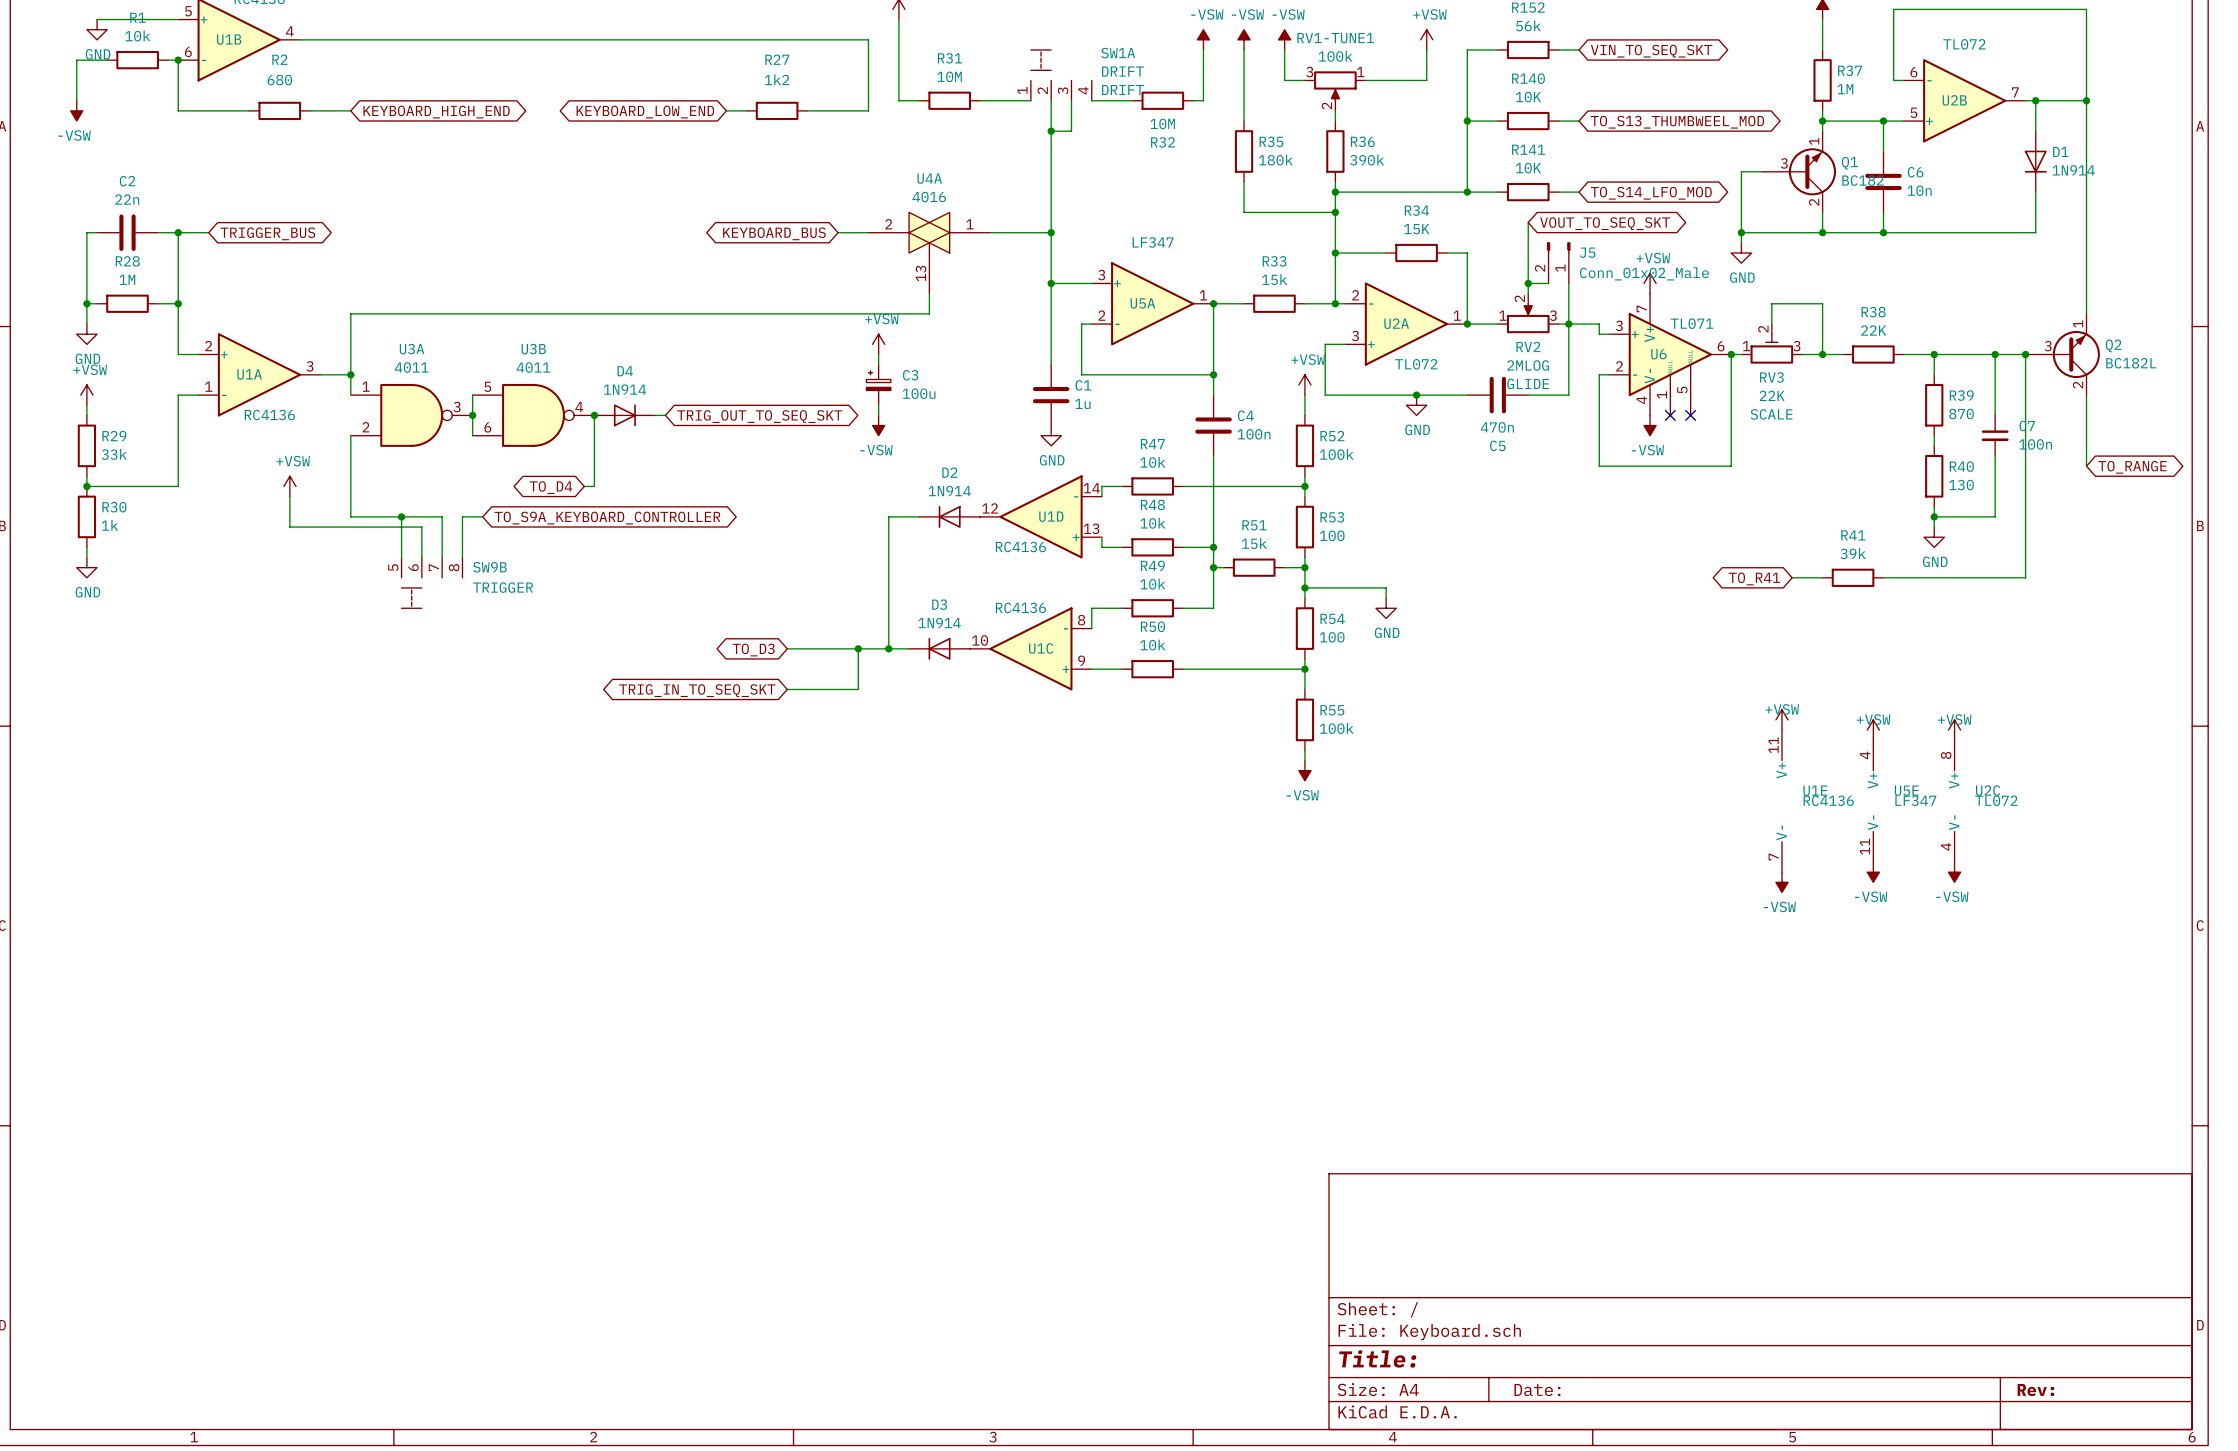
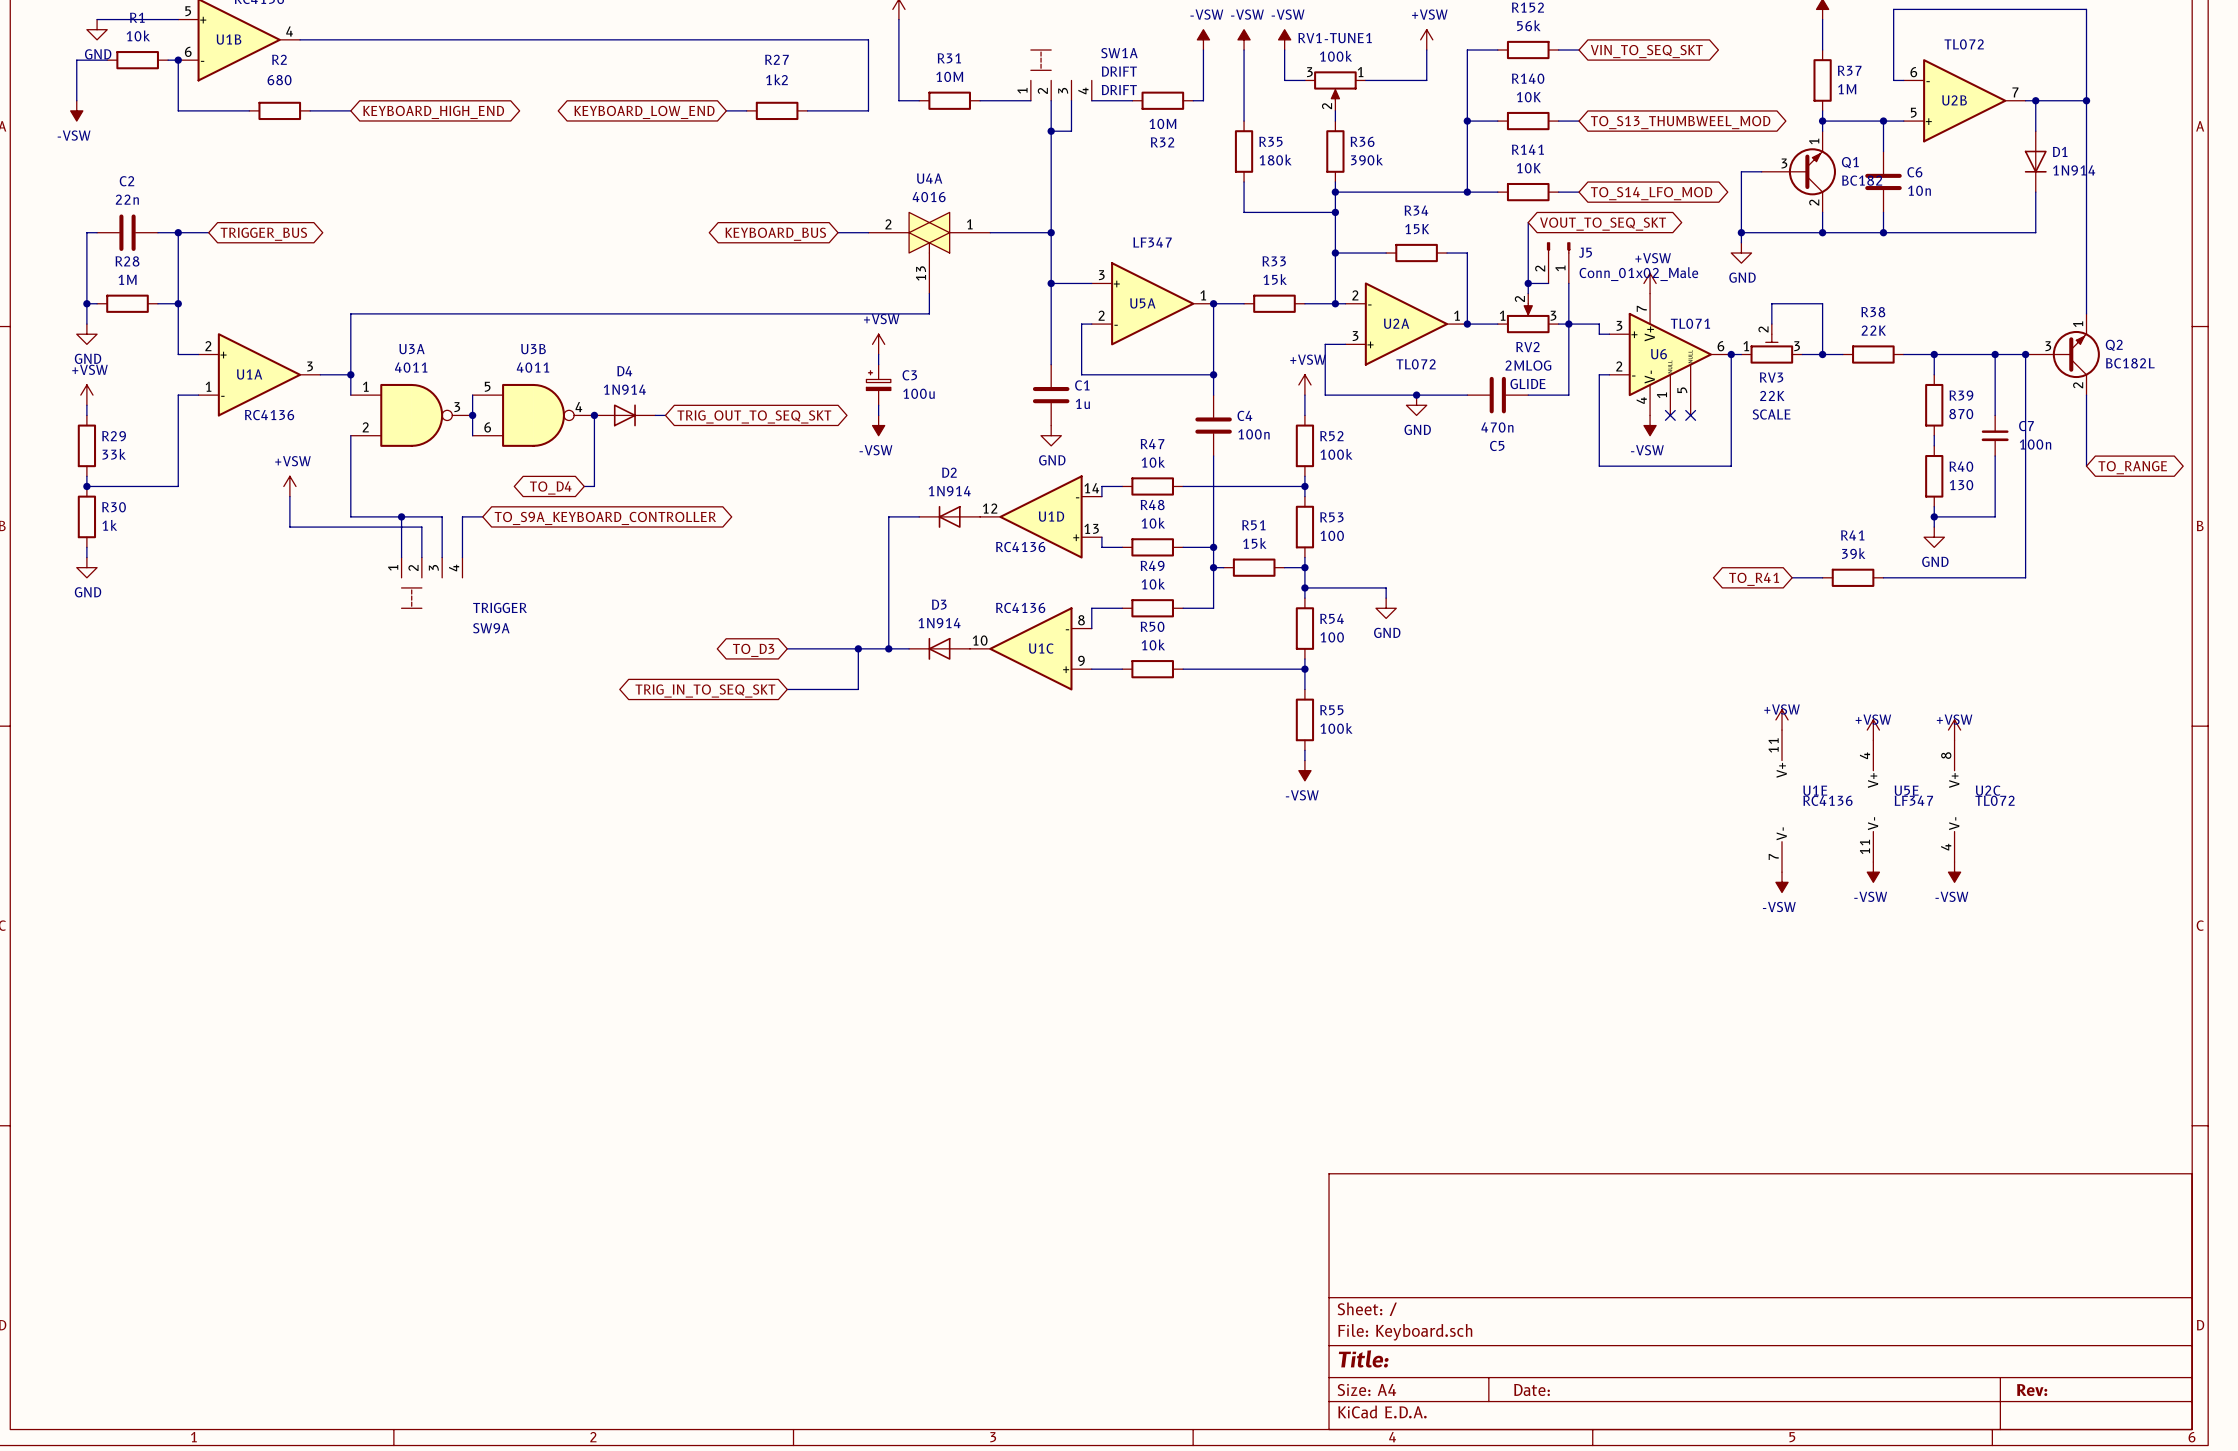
SW9B: TRIGGER (432, 582) -> none
SW9A: none -> TRIGGER (432, 587)

